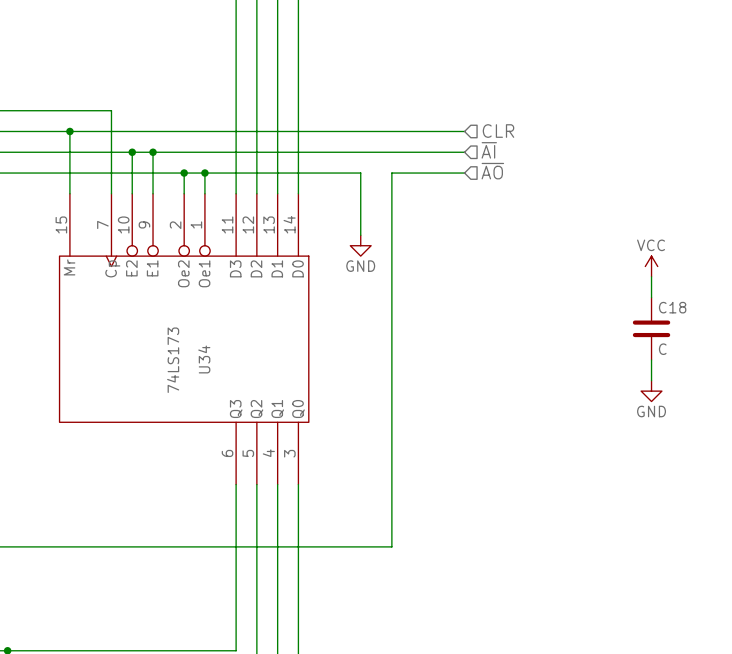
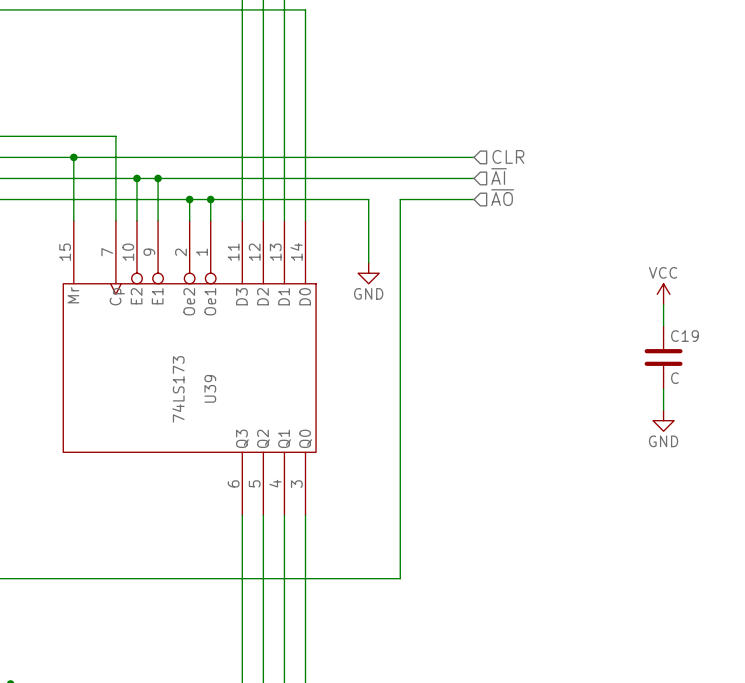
C18 name: C18 (672, 307) -> C19 (684, 336)
U34 name: U34 (204, 359) -> U39 (210, 388)

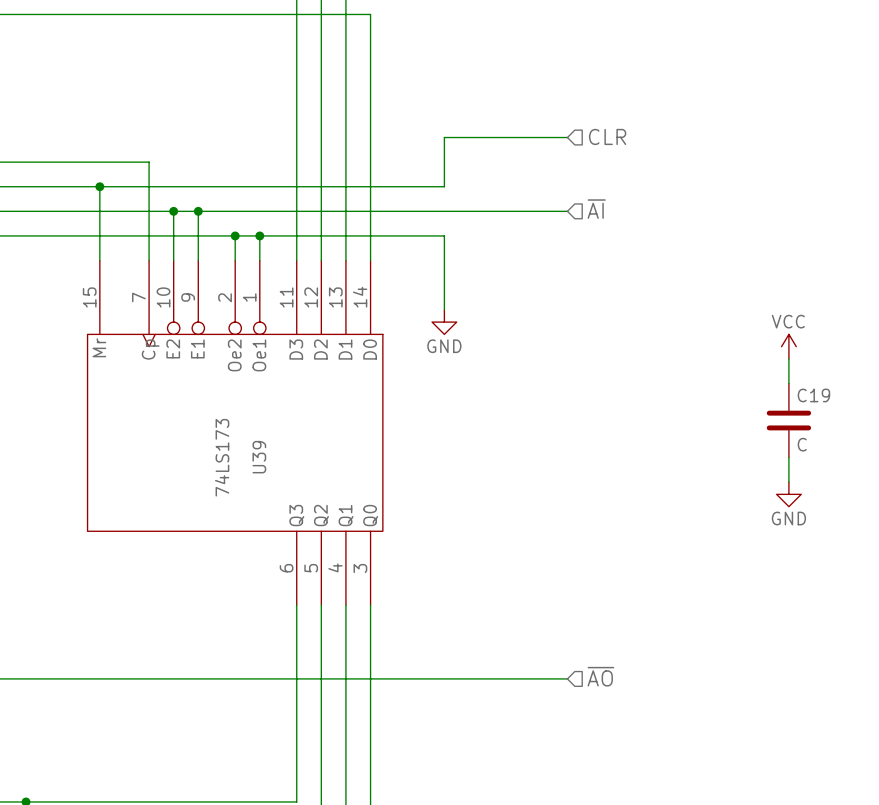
hierarchical label position: CLR (508, 156) -> CLR (607, 136)
wire: (368, 157) (474, 157) -> (444, 186) (444, 137) (567, 137)
hierarchical label: ~{AO} (502, 197) -> none
wire: (474, 199) (400, 199) (400, 578) -> (567, 678) (481, 678)
hierarchical label: none -> ~{AO} (600, 676)

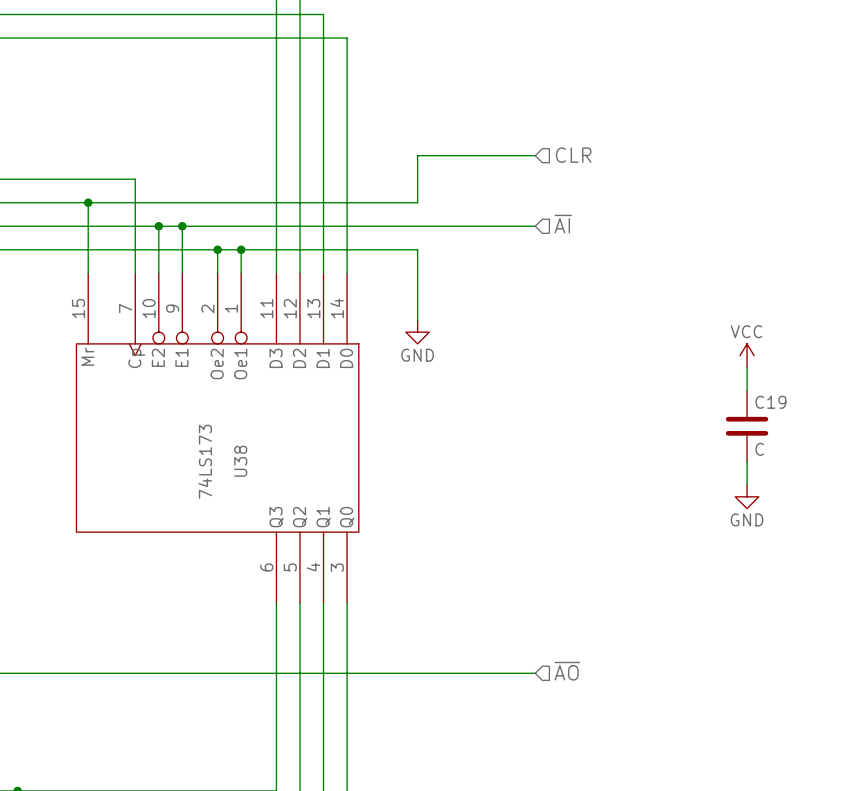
U39 name: U39 (259, 457) -> U38 (240, 461)

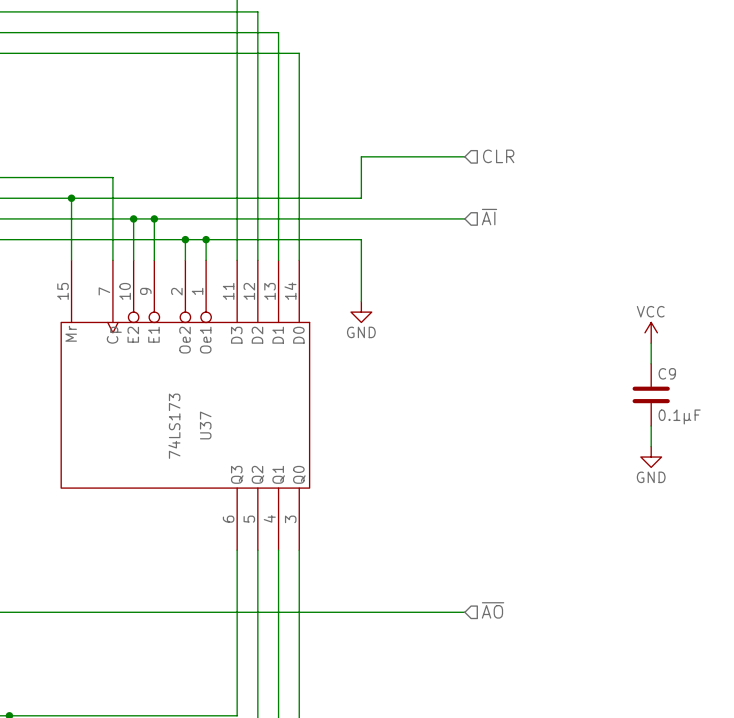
C19 name: C19 (770, 402) -> C9 (667, 373)
C19 value: C (759, 449) -> 0.1µF (679, 416)
U38 name: U38 (240, 461) -> U37 (205, 425)

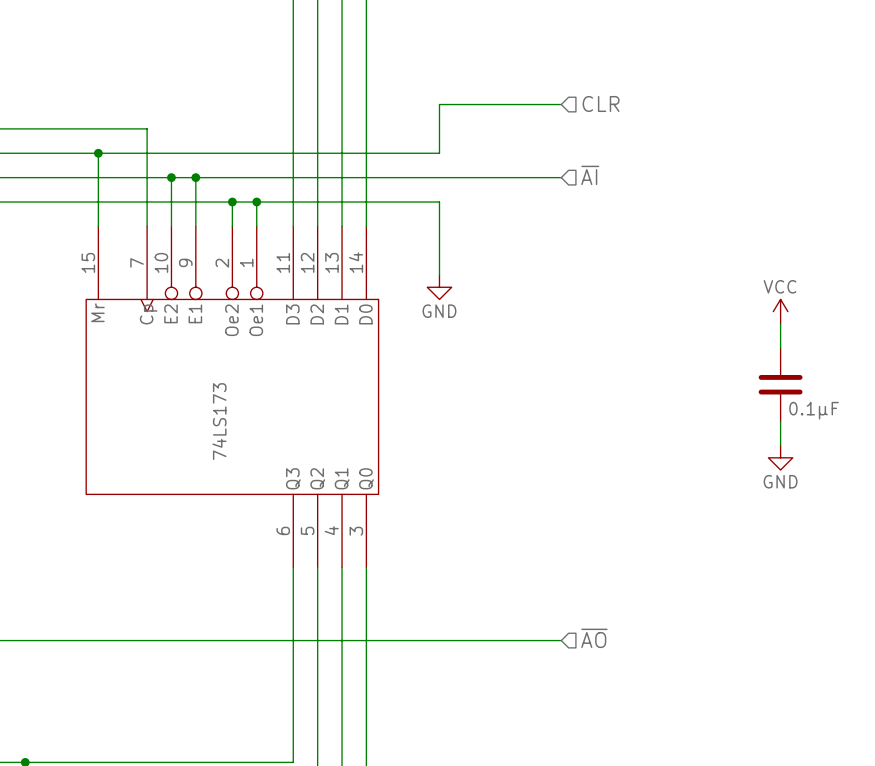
C9 name: C9 (667, 373) -> none
U37 name: U37 (205, 425) -> none

